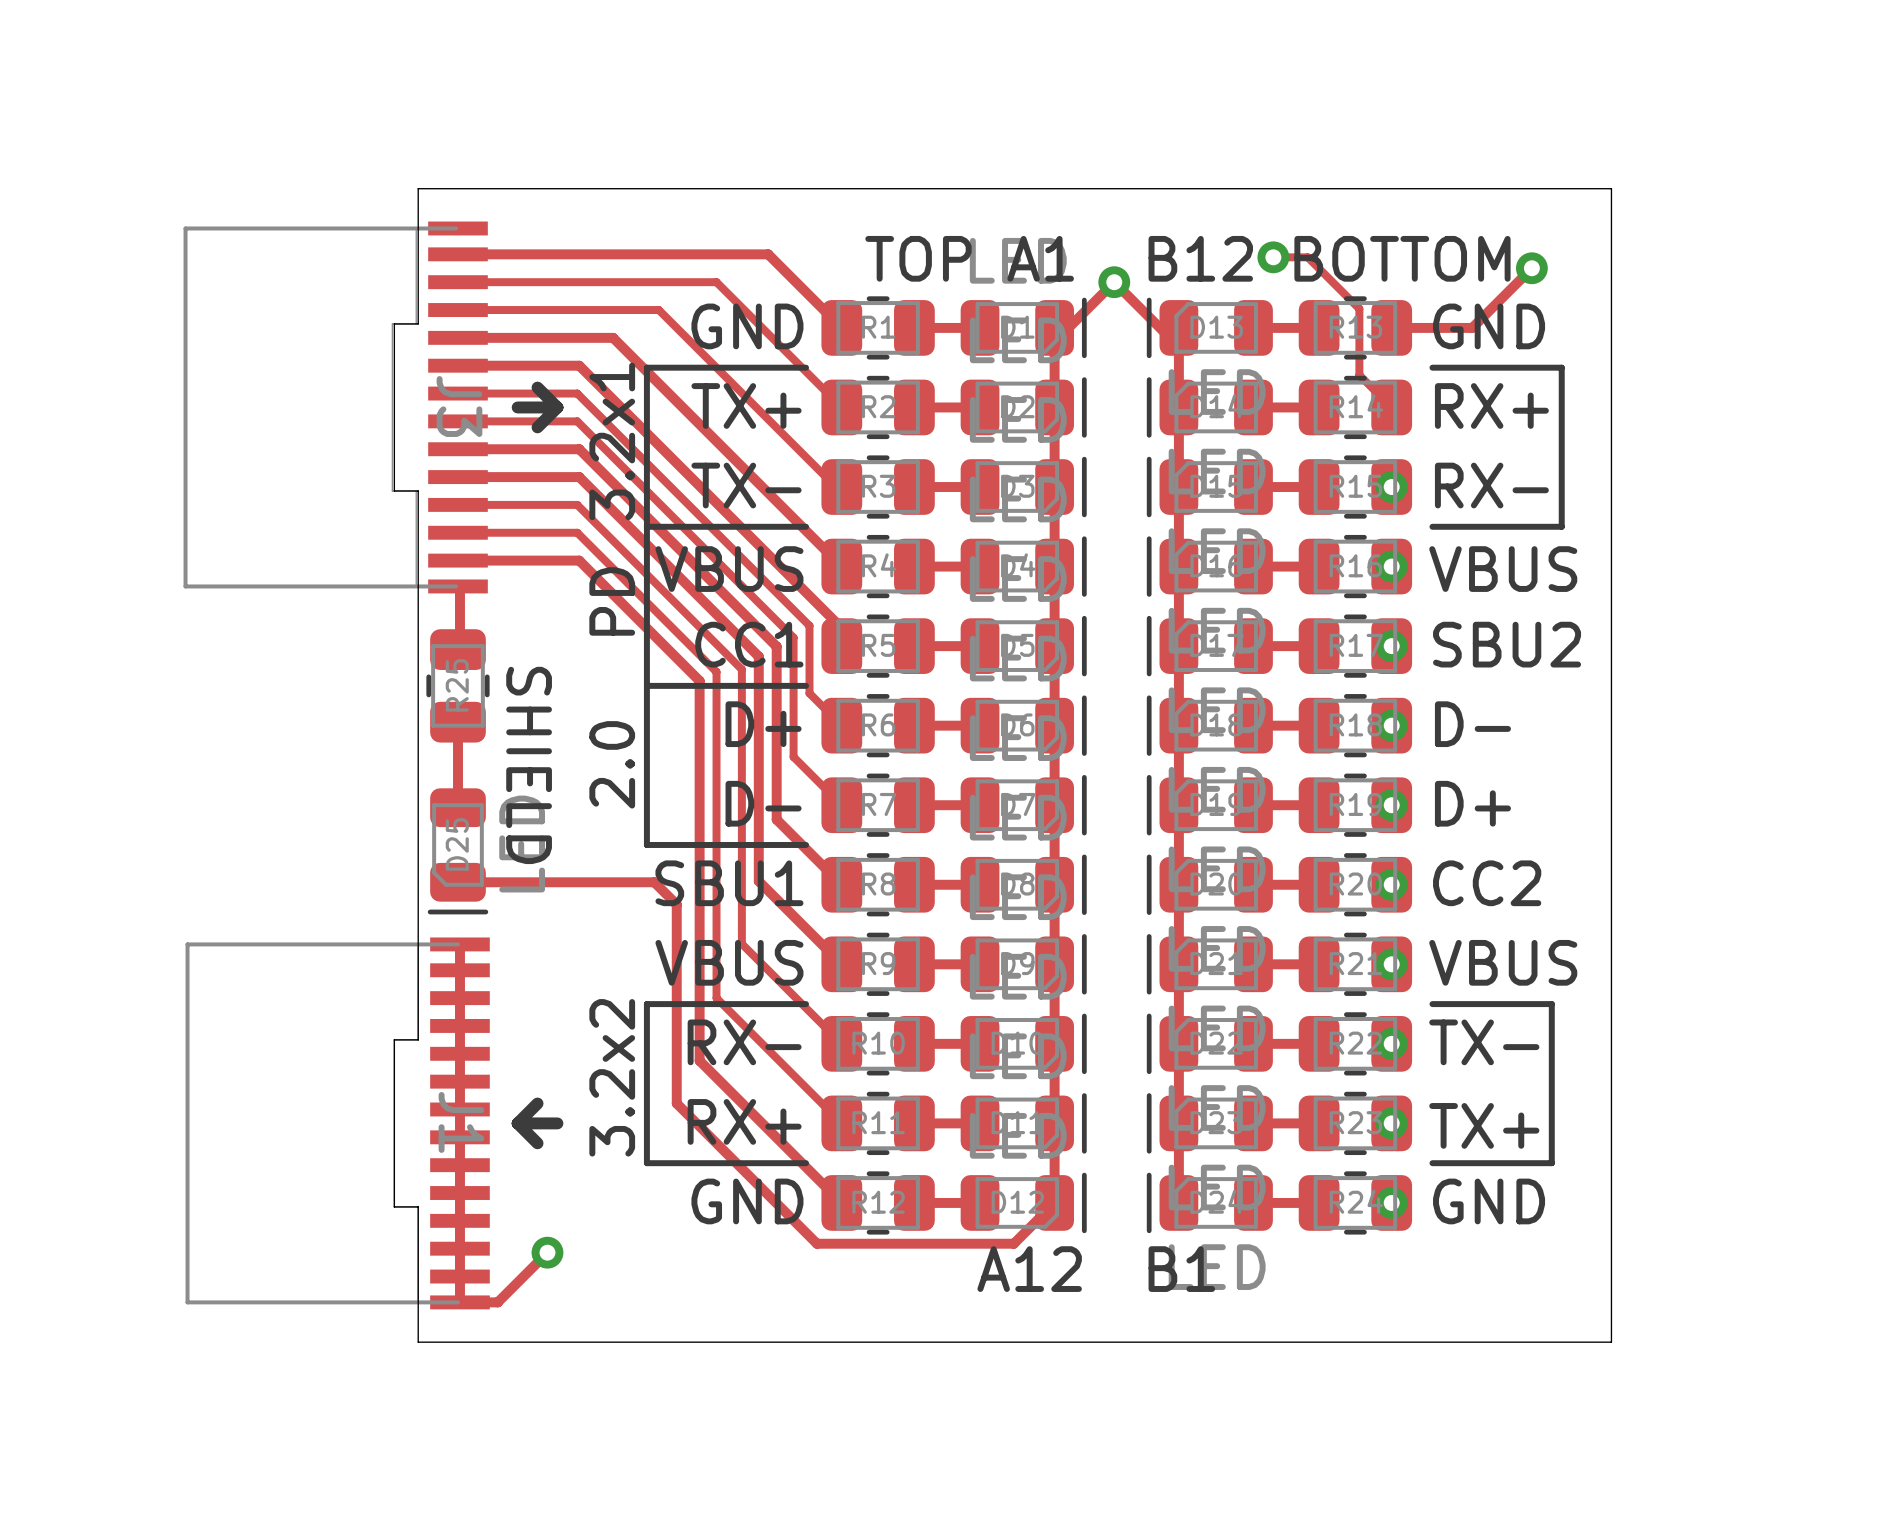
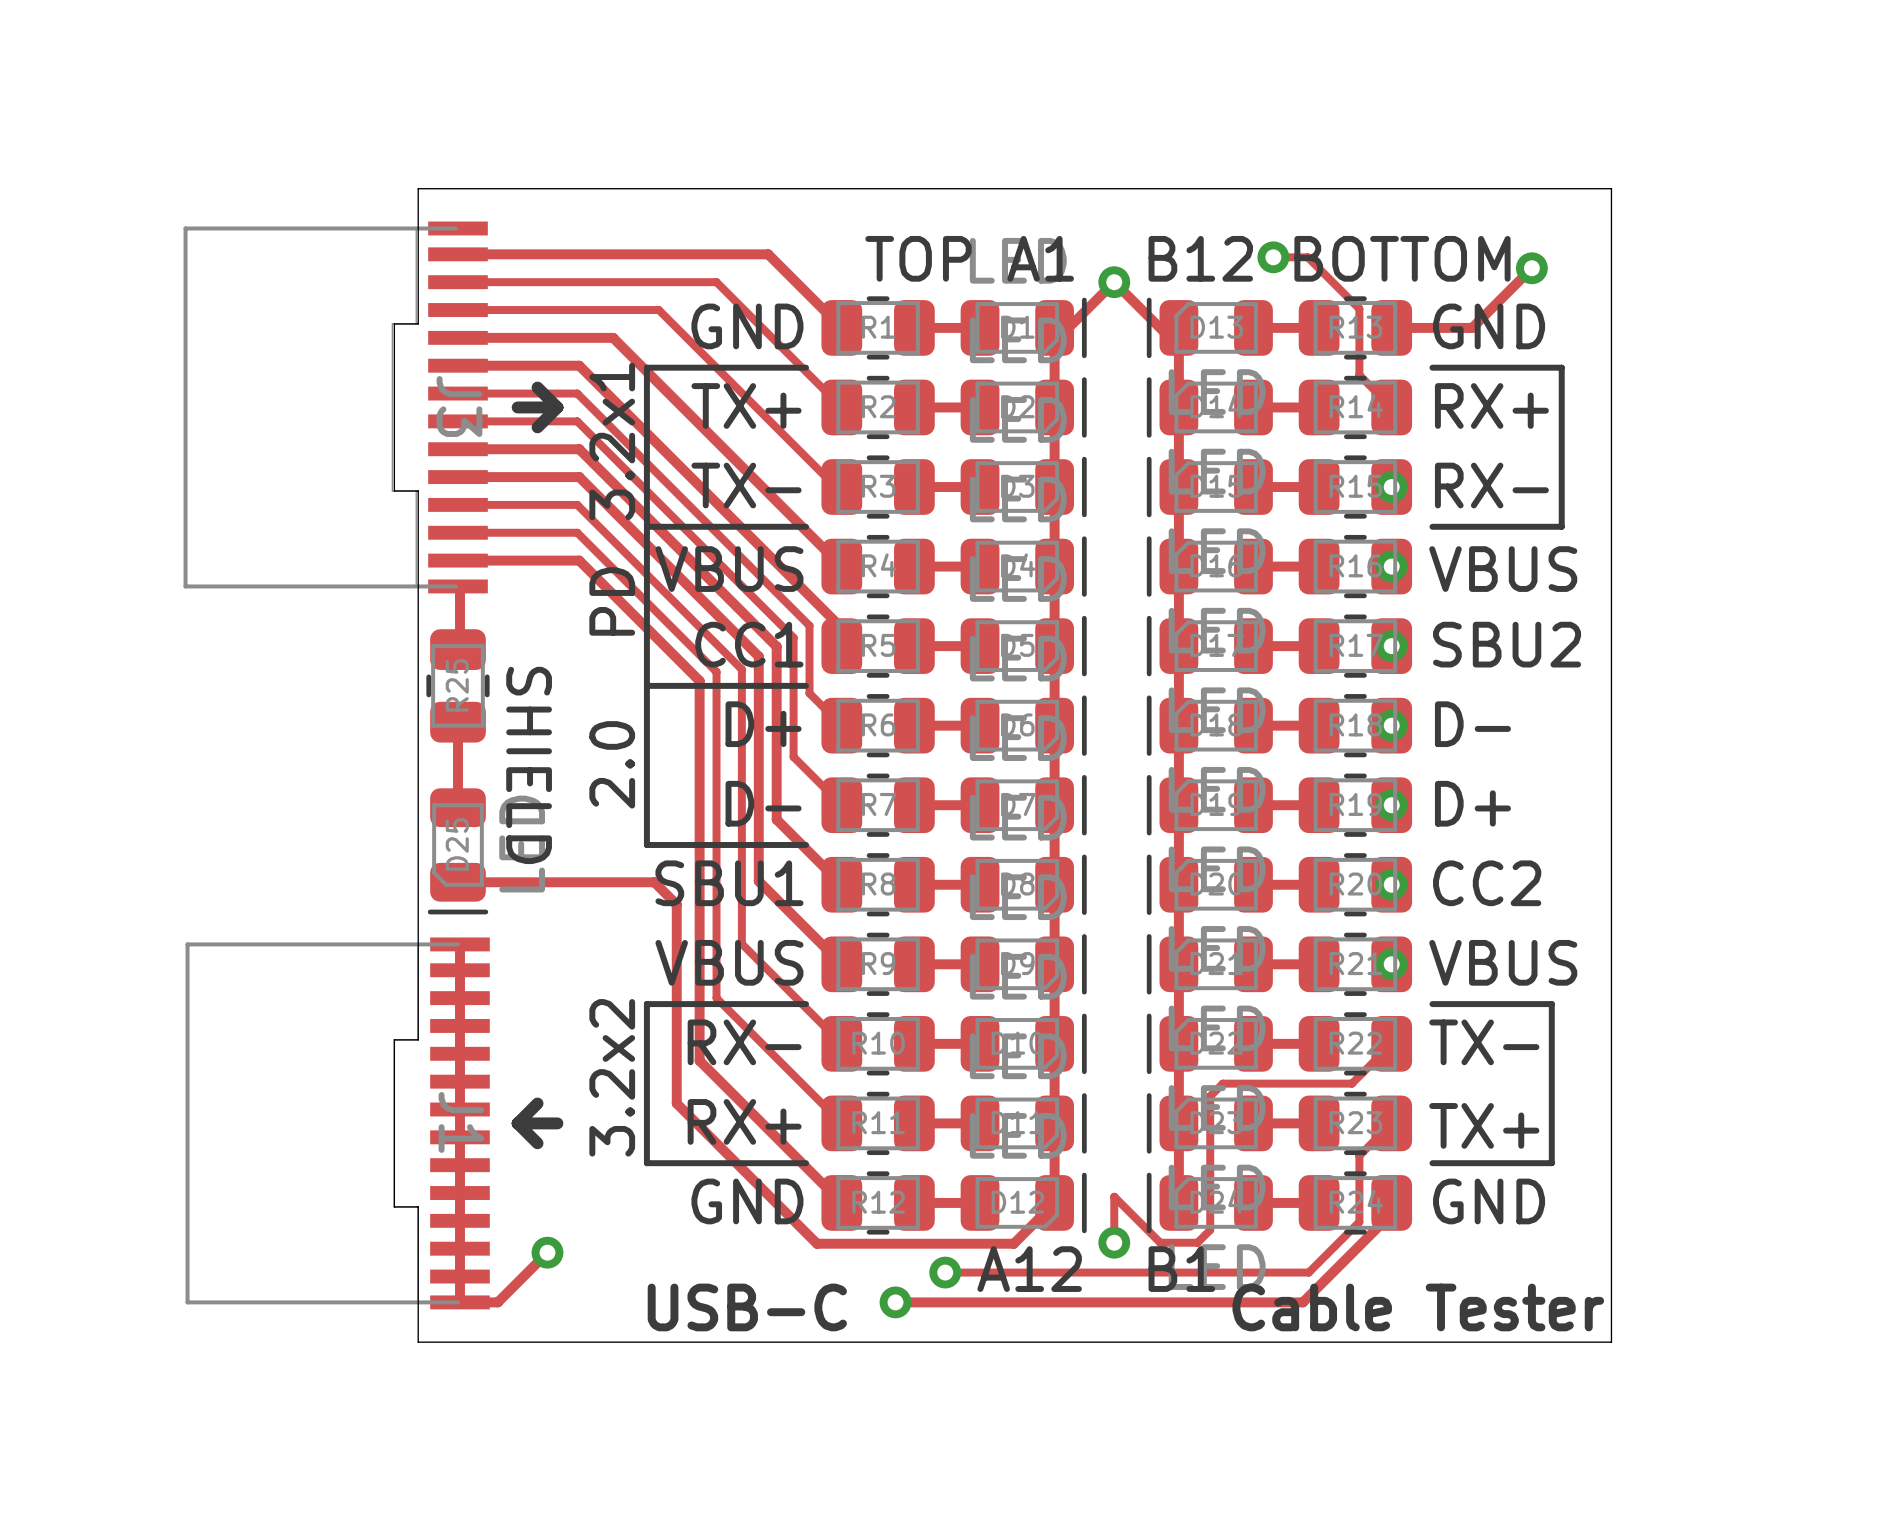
track: none -> (1391, 1043) (1351, 1083) (1222, 1083) (1210, 1096) (1210, 1230) (1197, 1242) (1160, 1242) (1114, 1196) (1114, 1242)
via: (1391, 1043) -> none
track: none -> (1391, 1123) (1359, 1155) (1359, 1221) (1308, 1272) (945, 1272)
via: (1391, 1123) -> none
track: none -> (1391, 1202) (1391, 1213) (1302, 1302) (895, 1302)
via: (1391, 1202) -> none
via: none -> (1114, 1242)
via: none -> (945, 1272)
via: none -> (895, 1302)
text: none -> USB-C (747, 1307)
text: none -> Cable Tester (1418, 1307)

